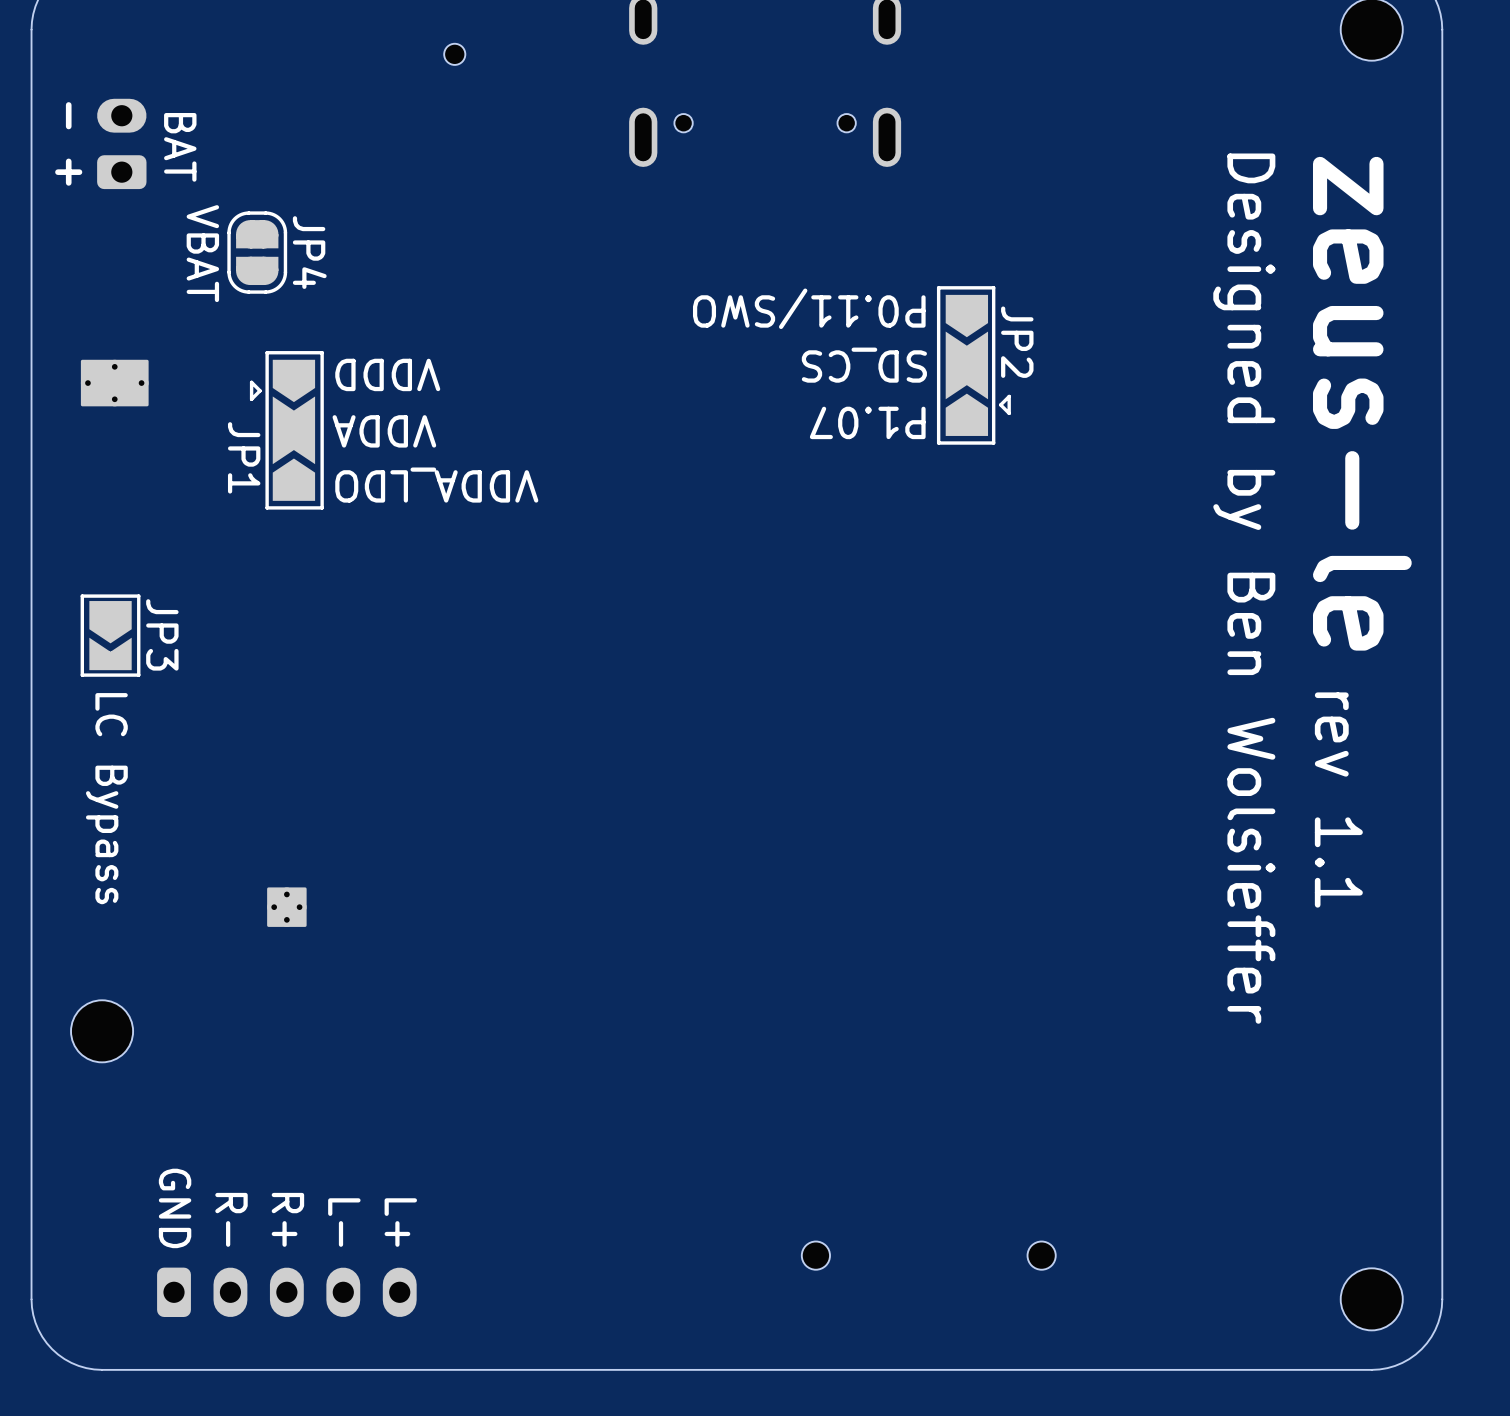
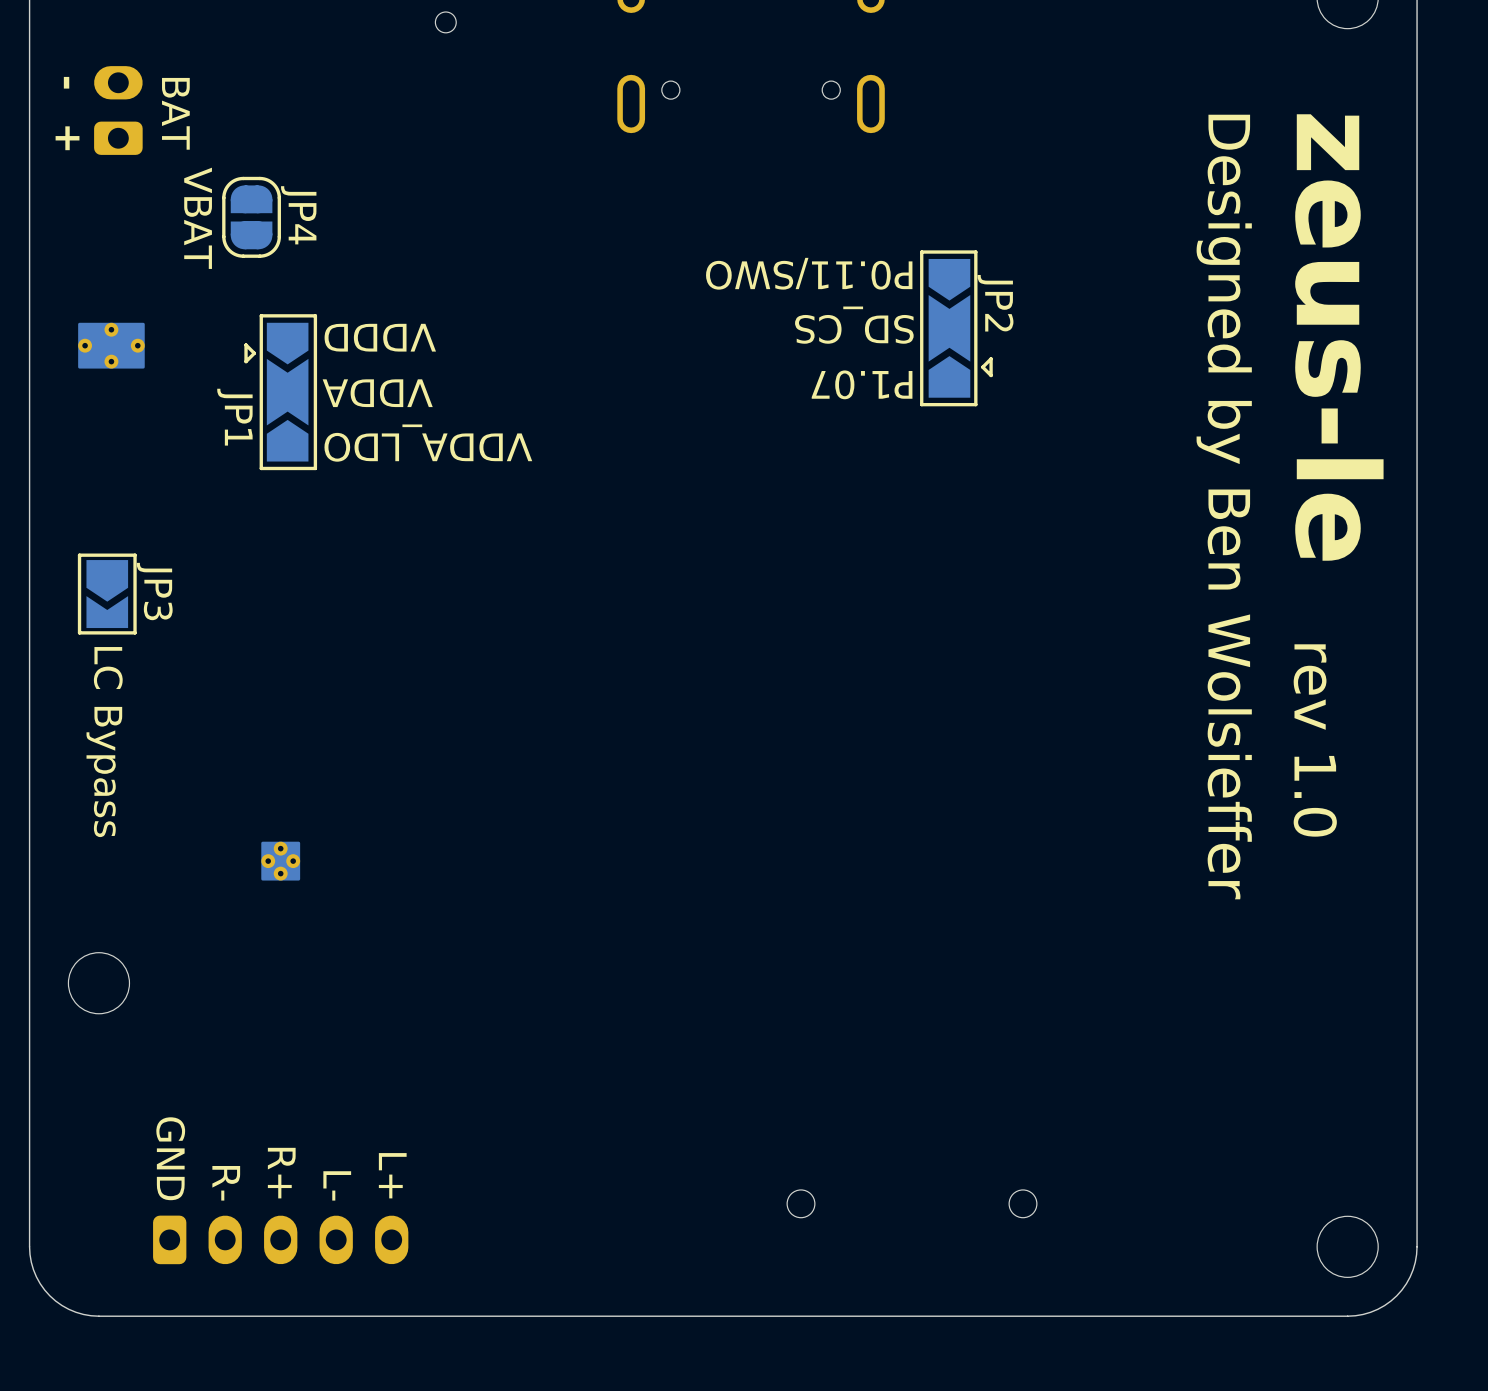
text: rev 1.1 (1338, 800) -> rev 1.0 (1315, 740)

